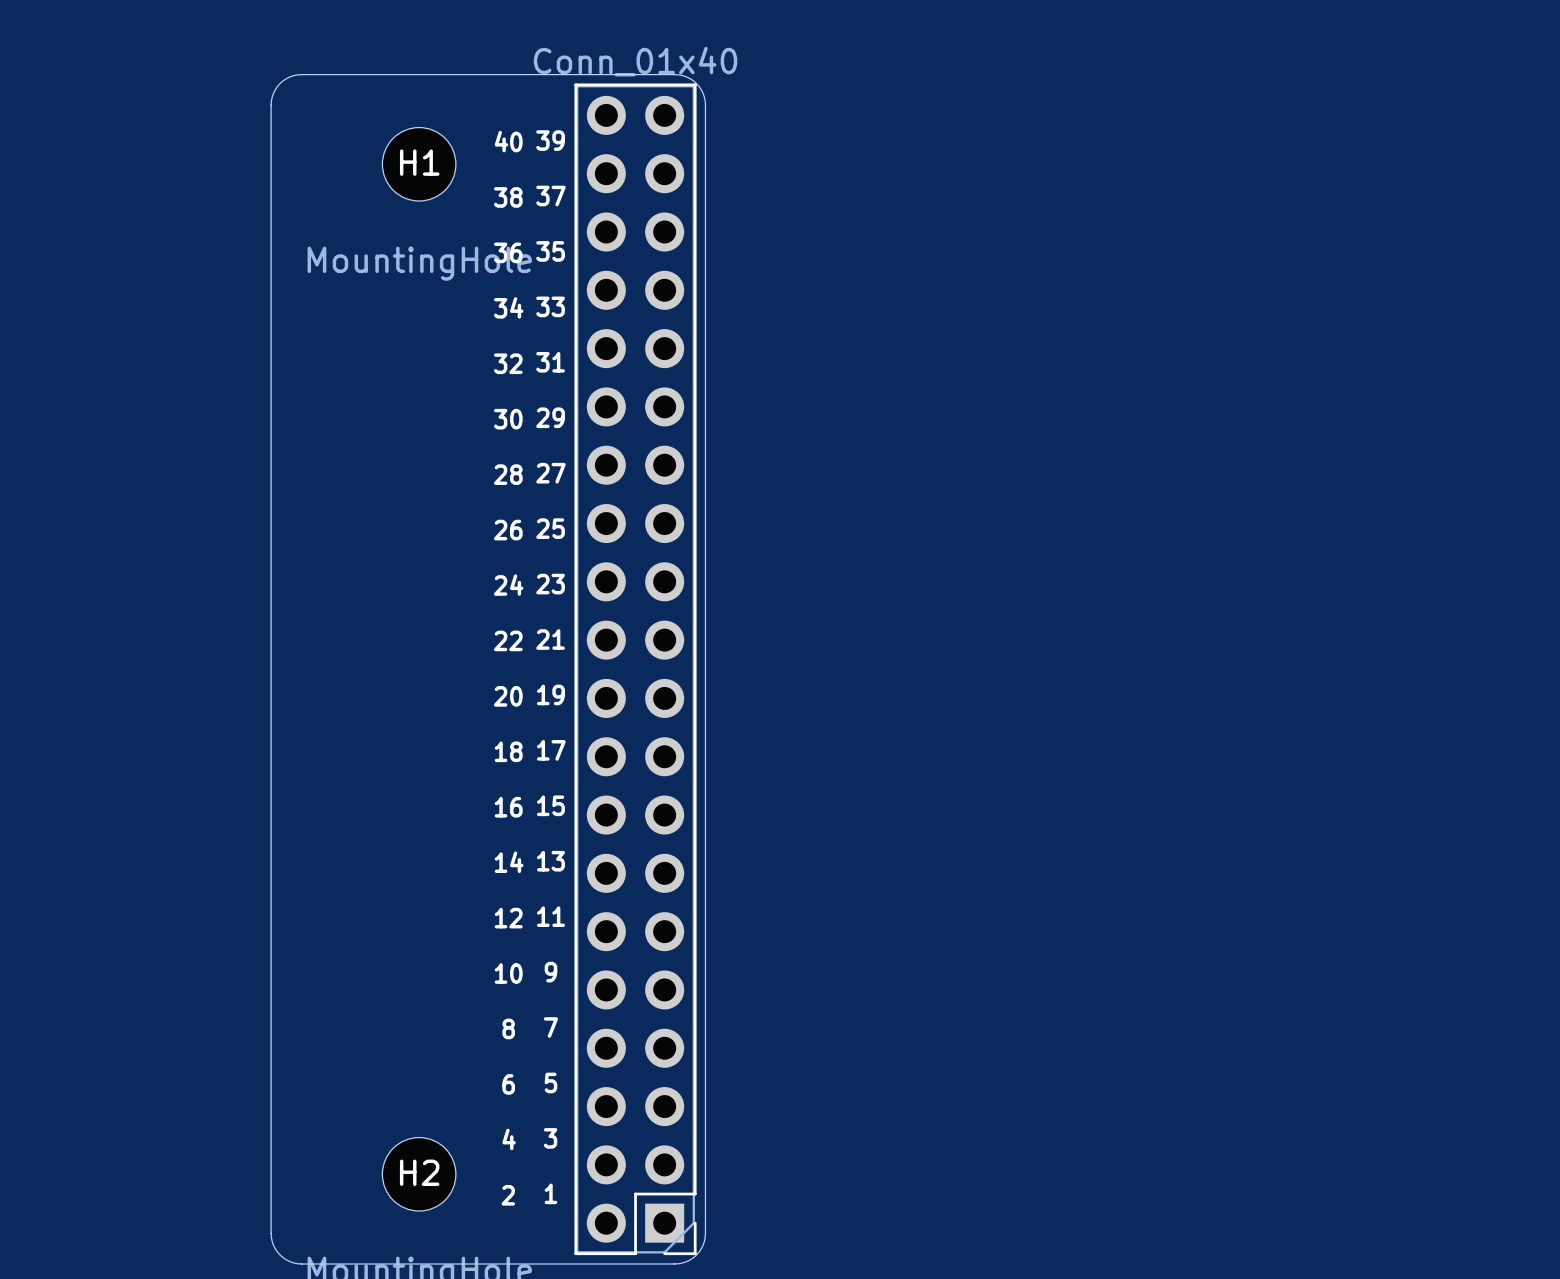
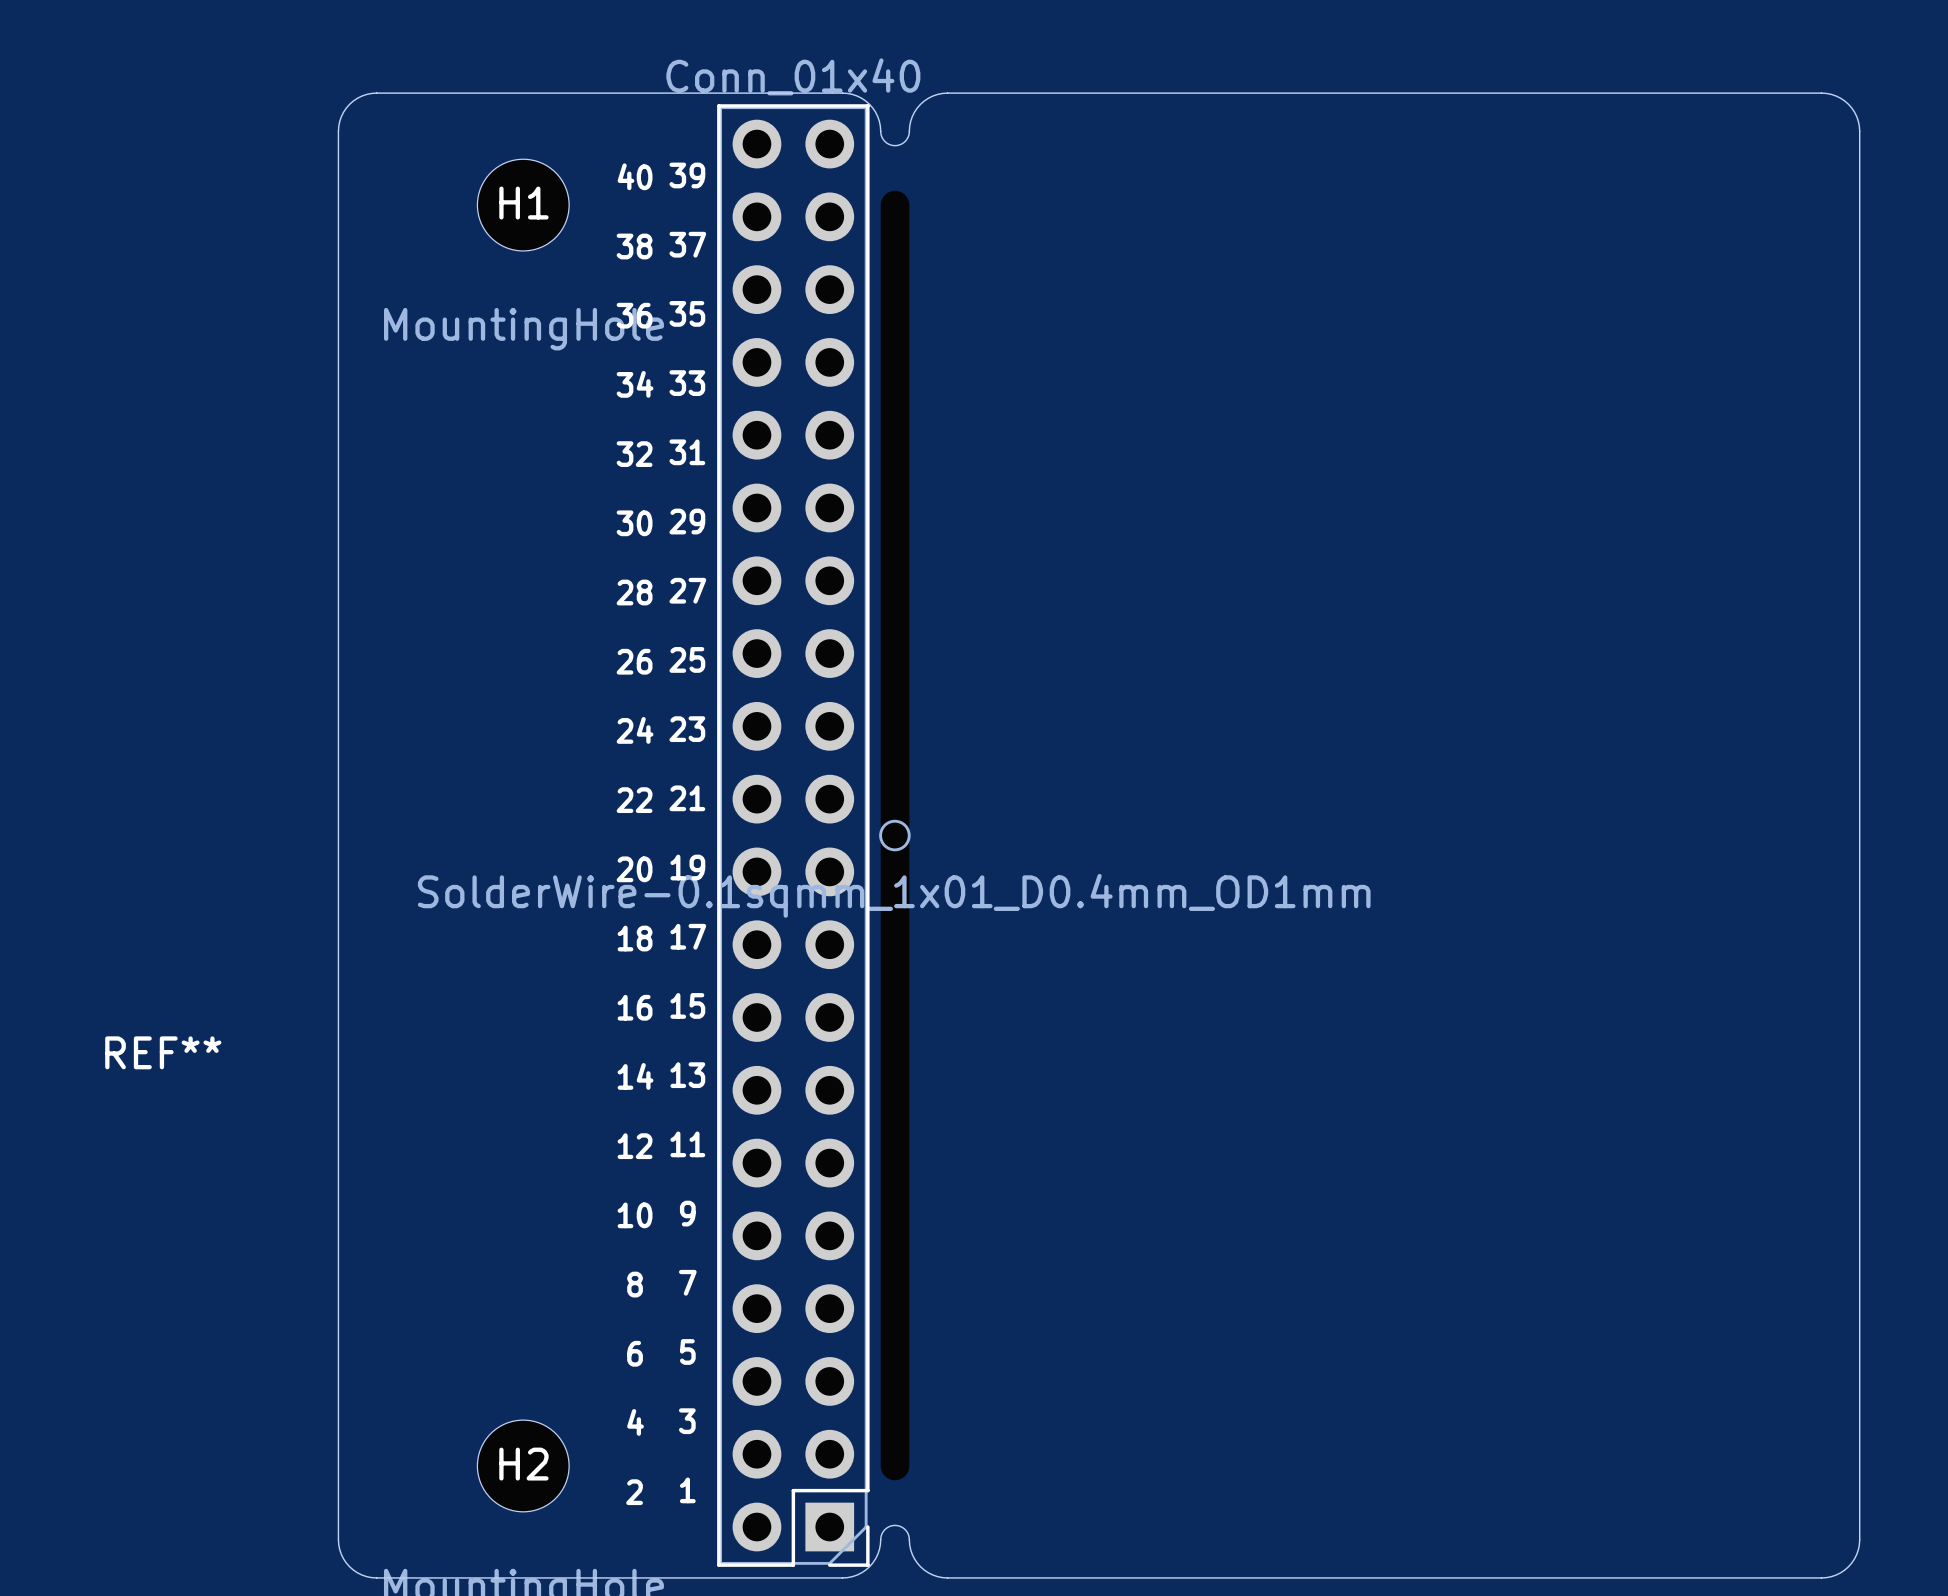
board edge: (705, 105) (705, 1233) -> (880, 131) (882, 138) (887, 143) (895, 145) (902, 143) (908, 136) (912, 116) (920, 104) (932, 96) (947, 93) (1821, 93) (1836, 96) (1848, 104) (1856, 116) (1859, 131) (1859, 1539) (1858, 1549) (1851, 1563) (1840, 1572) (1821, 1577) (947, 1577) (932, 1575) (920, 1566) (912, 1554) (908, 1534) (902, 1527) (895, 1525) (887, 1527) (882, 1532) (880, 1539)
REF**: none -> SolderWire-0.1sqmm_1x01_D0.4mm_OD1mm (894, 835)

